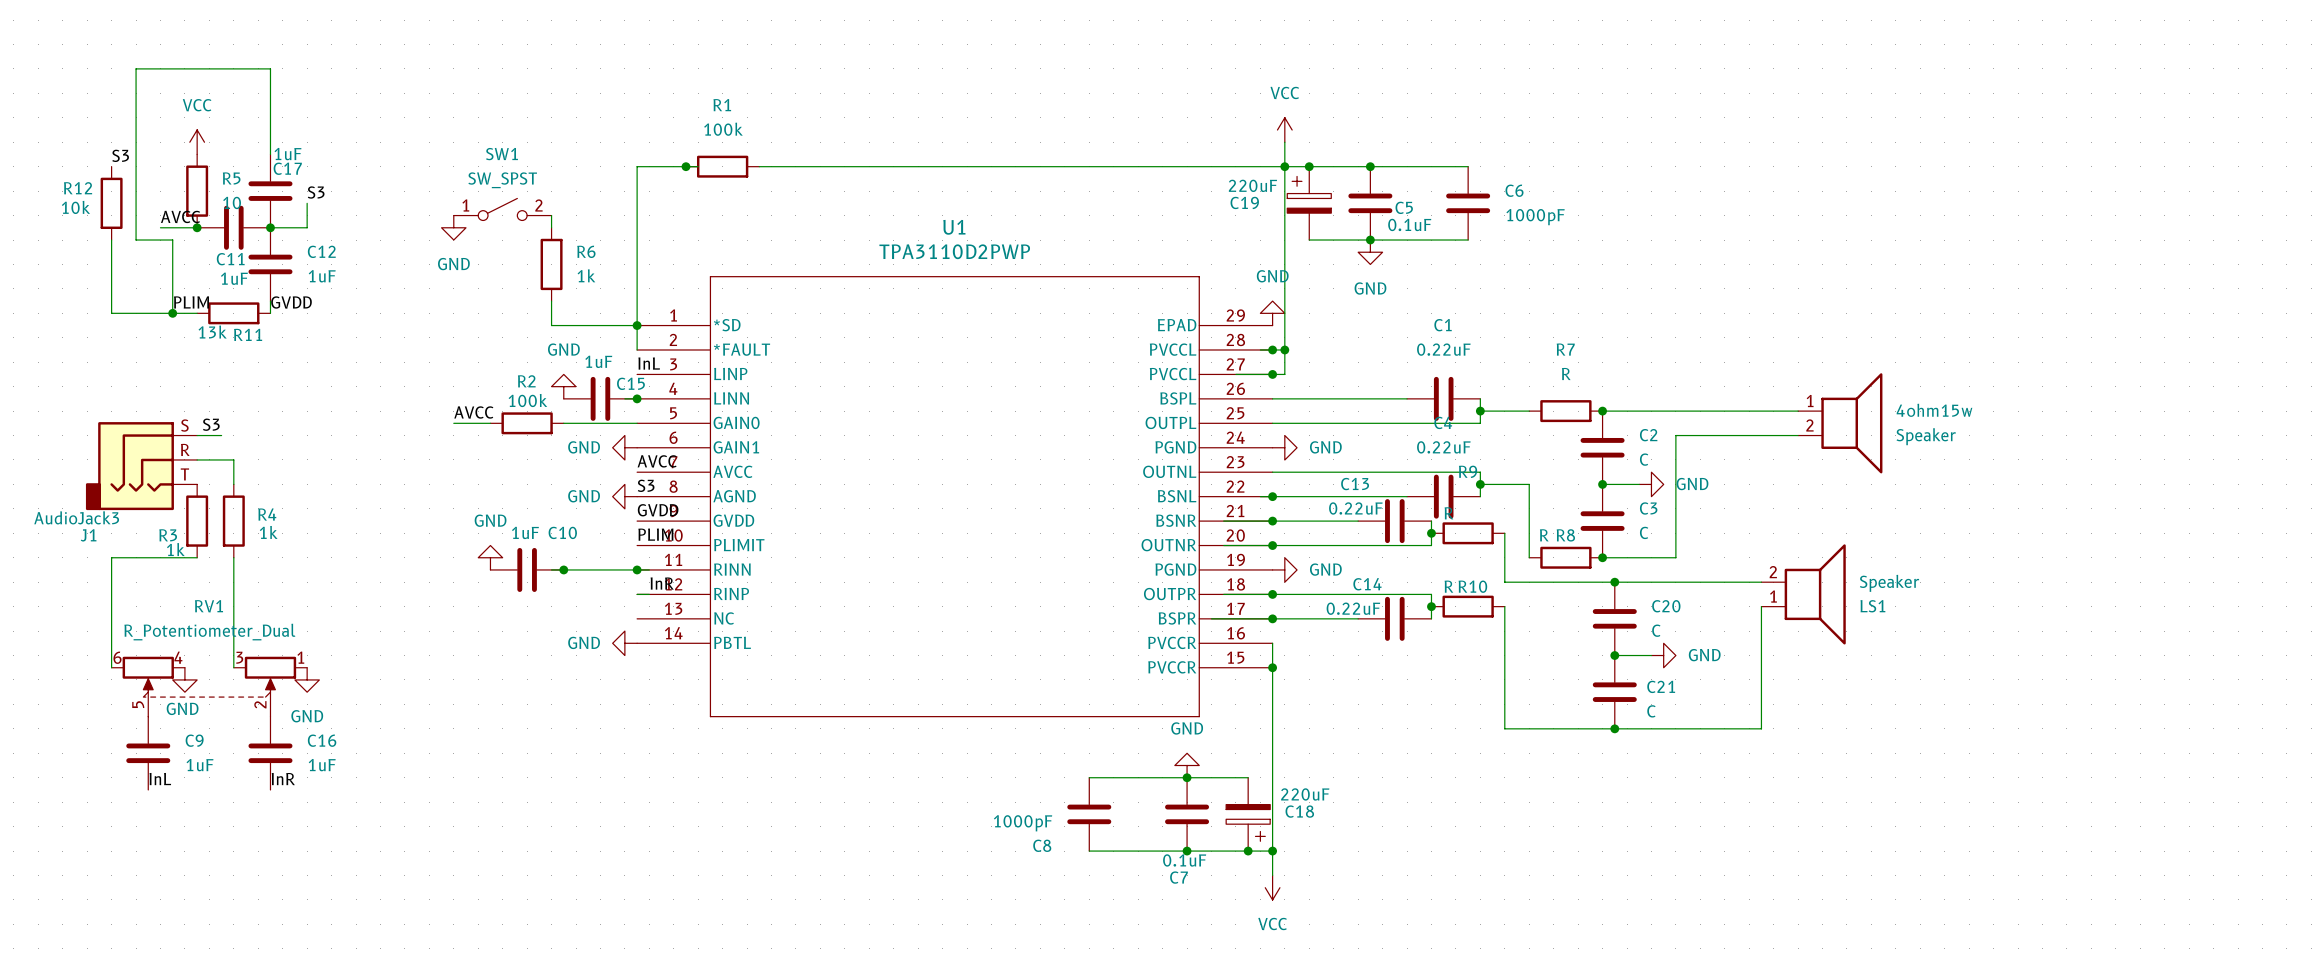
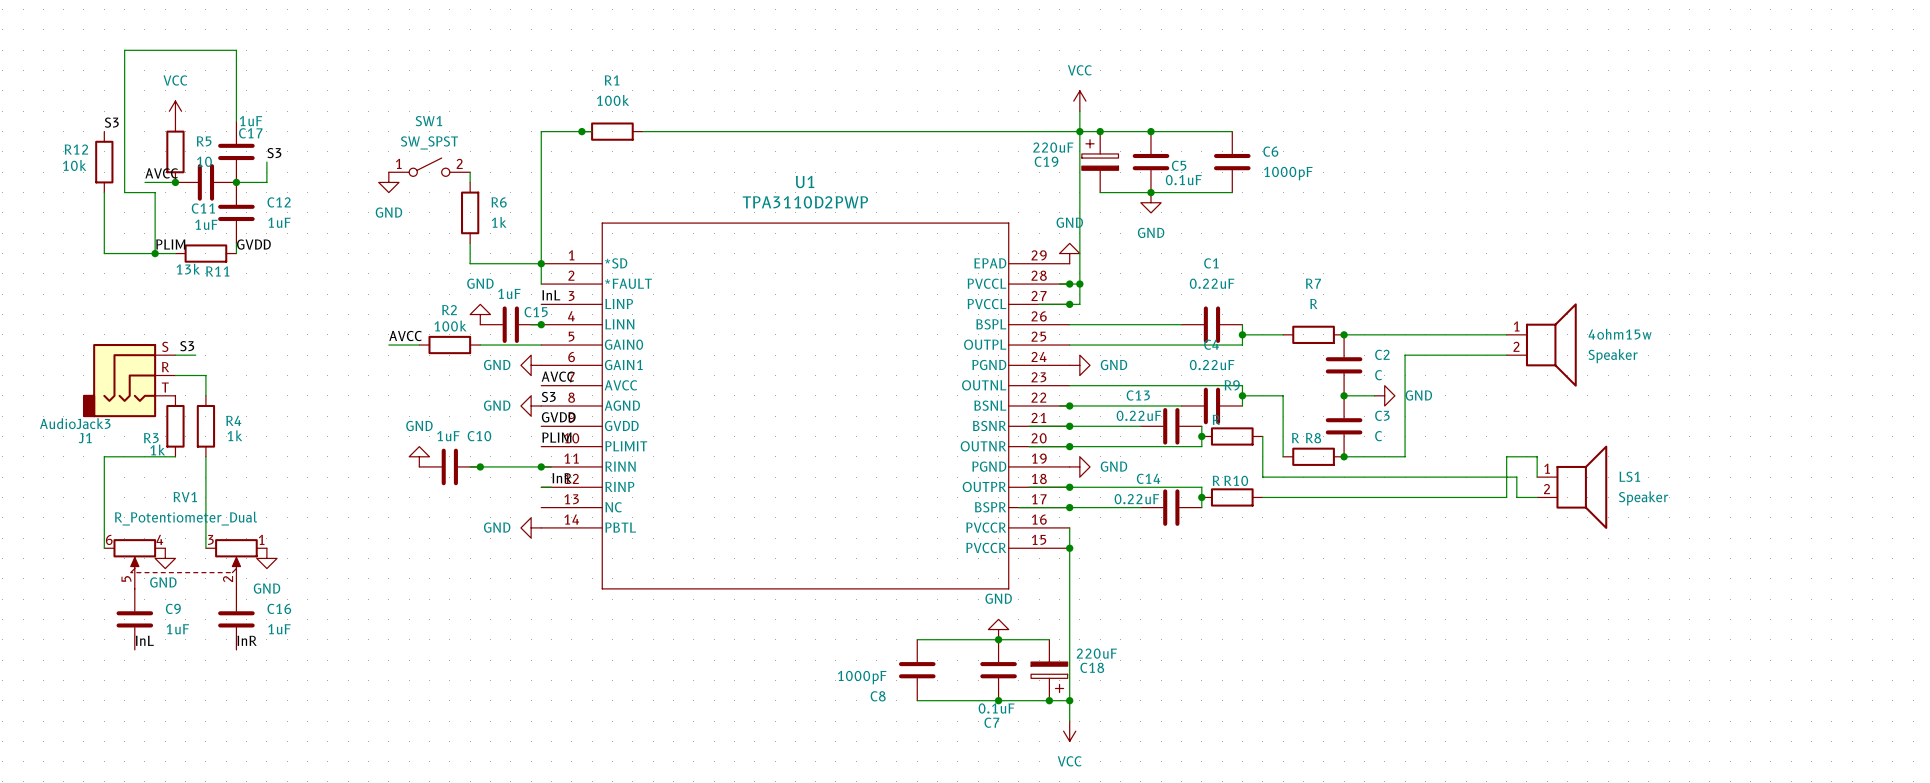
junction: (1614, 582) -> none
wire: none -> (1476, 477) (1516, 477) (1516, 497) (1537, 497)
LS1 position: (1803, 594) -> (1572, 487)
LS1 flip: as is (1815, 594) -> up-down (1581, 487)
wire: (1504, 606) (1504, 728) (1761, 728) (1761, 606) -> (1262, 497) (1506, 497) (1506, 456) (1537, 456) (1537, 477)
C20: C (1614, 618) -> none
wire: (1614, 655) (1651, 655) -> none
junction: (1614, 655) -> none
power symbol: GND (1663, 655) -> none
C21: C (1614, 692) -> none
junction: (1614, 728) -> none

